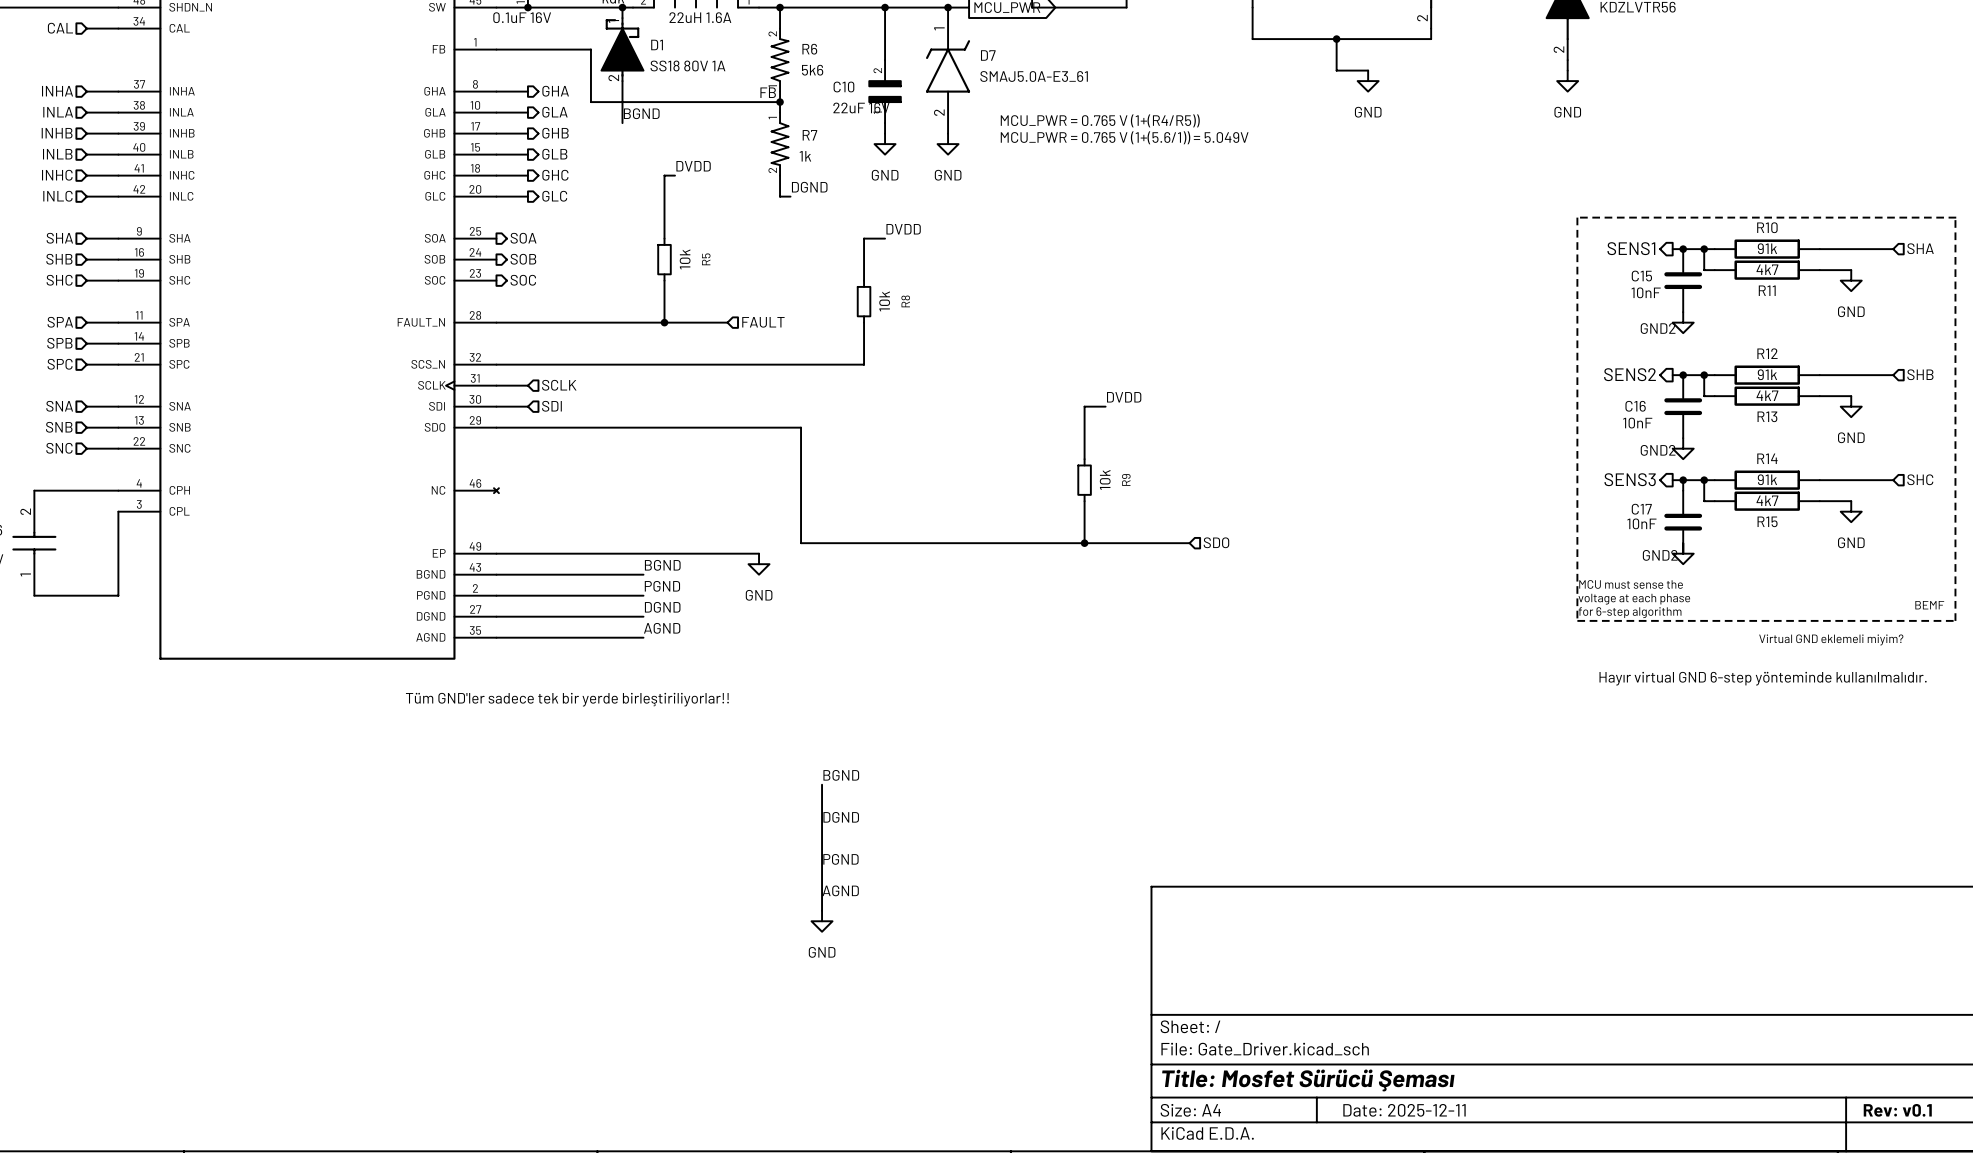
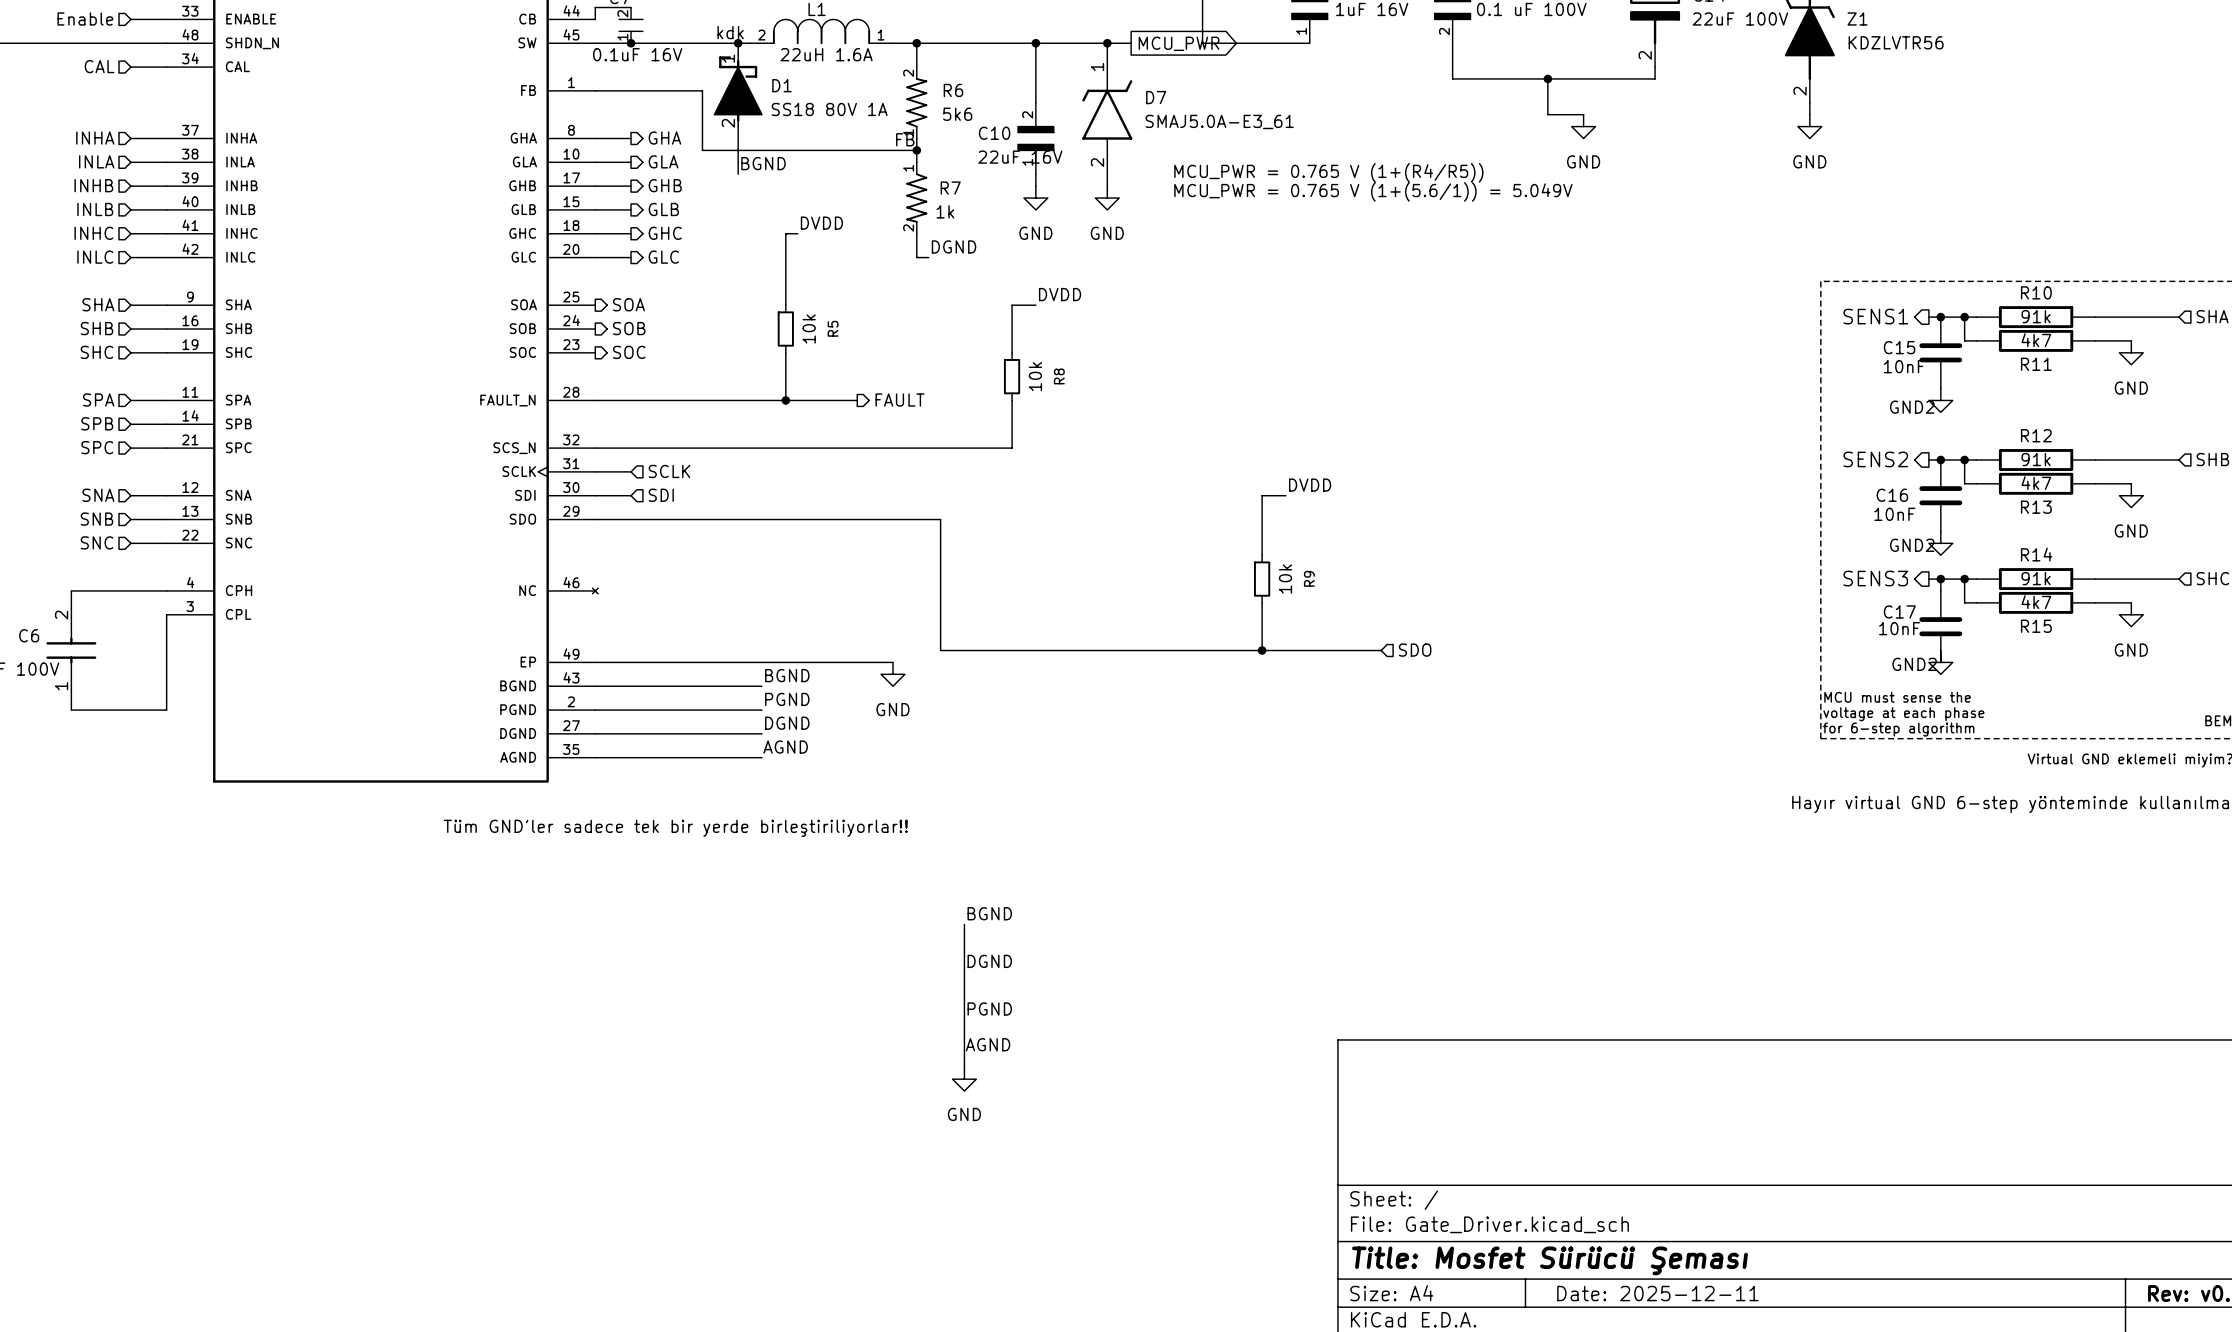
hierarchical label shape: input (763, 322) -> output (899, 400)

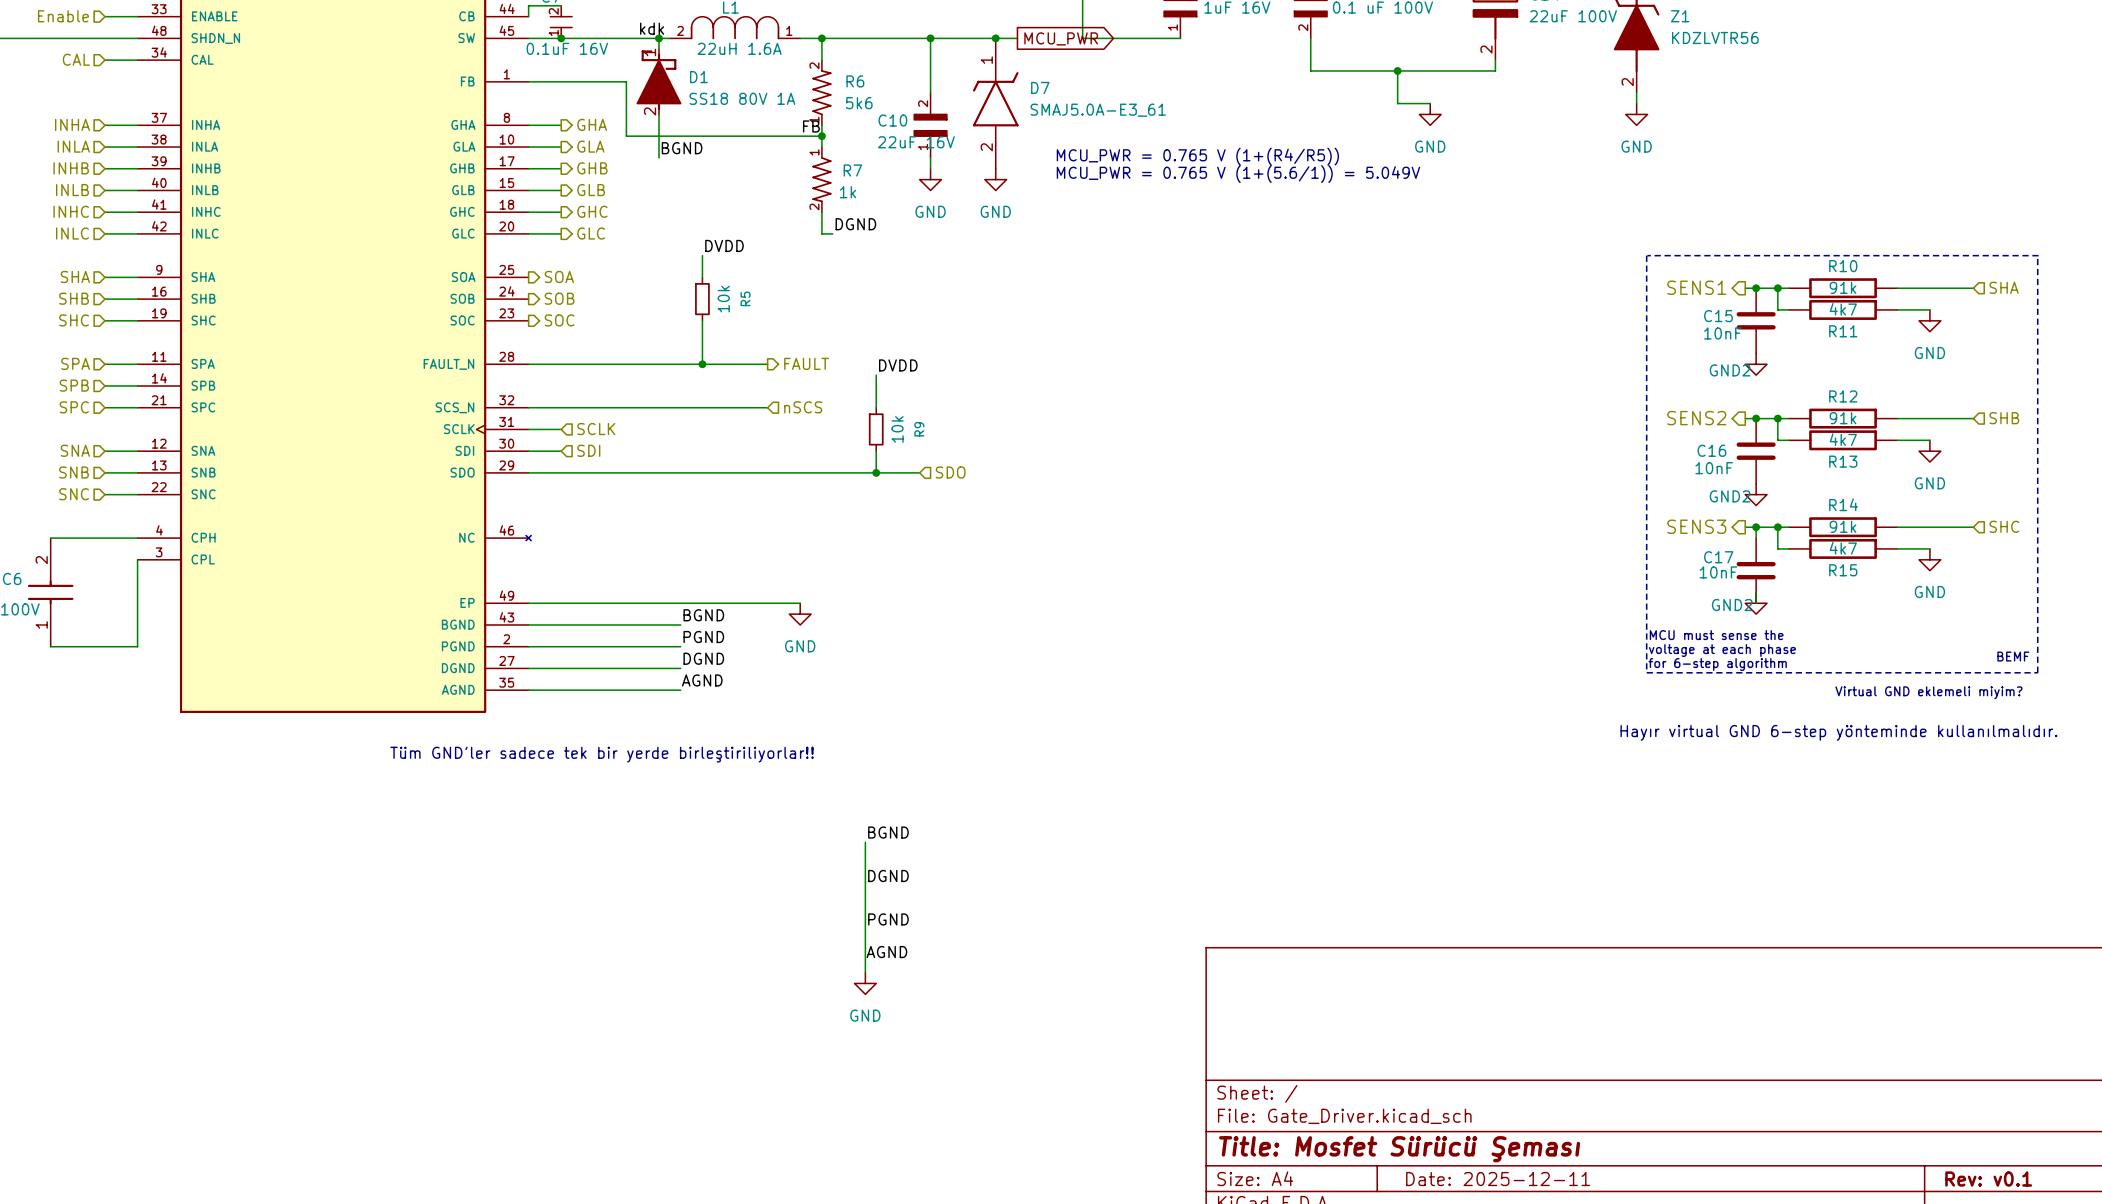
label position: DVDD (821, 223) -> DVDD (724, 245)
wire: (797, 233) (785, 233) (785, 281) -> none
label position: DVDD (1060, 294) -> DVDD (898, 365)
wire: (1035, 305) (1012, 305) (1012, 352) -> none
R8: 10k (1012, 376) -> none
wire: (1012, 400) (1012, 448) (857, 448) -> none
wire: none -> (876, 375) (876, 407)
hierarchical label: none -> nSCS (803, 407)
label: DVDD (1310, 485) -> none
wire: none -> (876, 451) (876, 472)
wire: (1285, 495) (1262, 495) (1262, 555) -> none
wire: (940, 519) (940, 650) (1381, 650) -> (843, 472) (919, 472)
junction: none -> (876, 472)
hierarchical label: none -> SDO (950, 472)
R9 position: (1262, 579) -> (876, 429)
wire: (1262, 602) (1262, 650) -> none
junction: (1262, 650) -> none
hierarchical label: SDO (1415, 650) -> none

